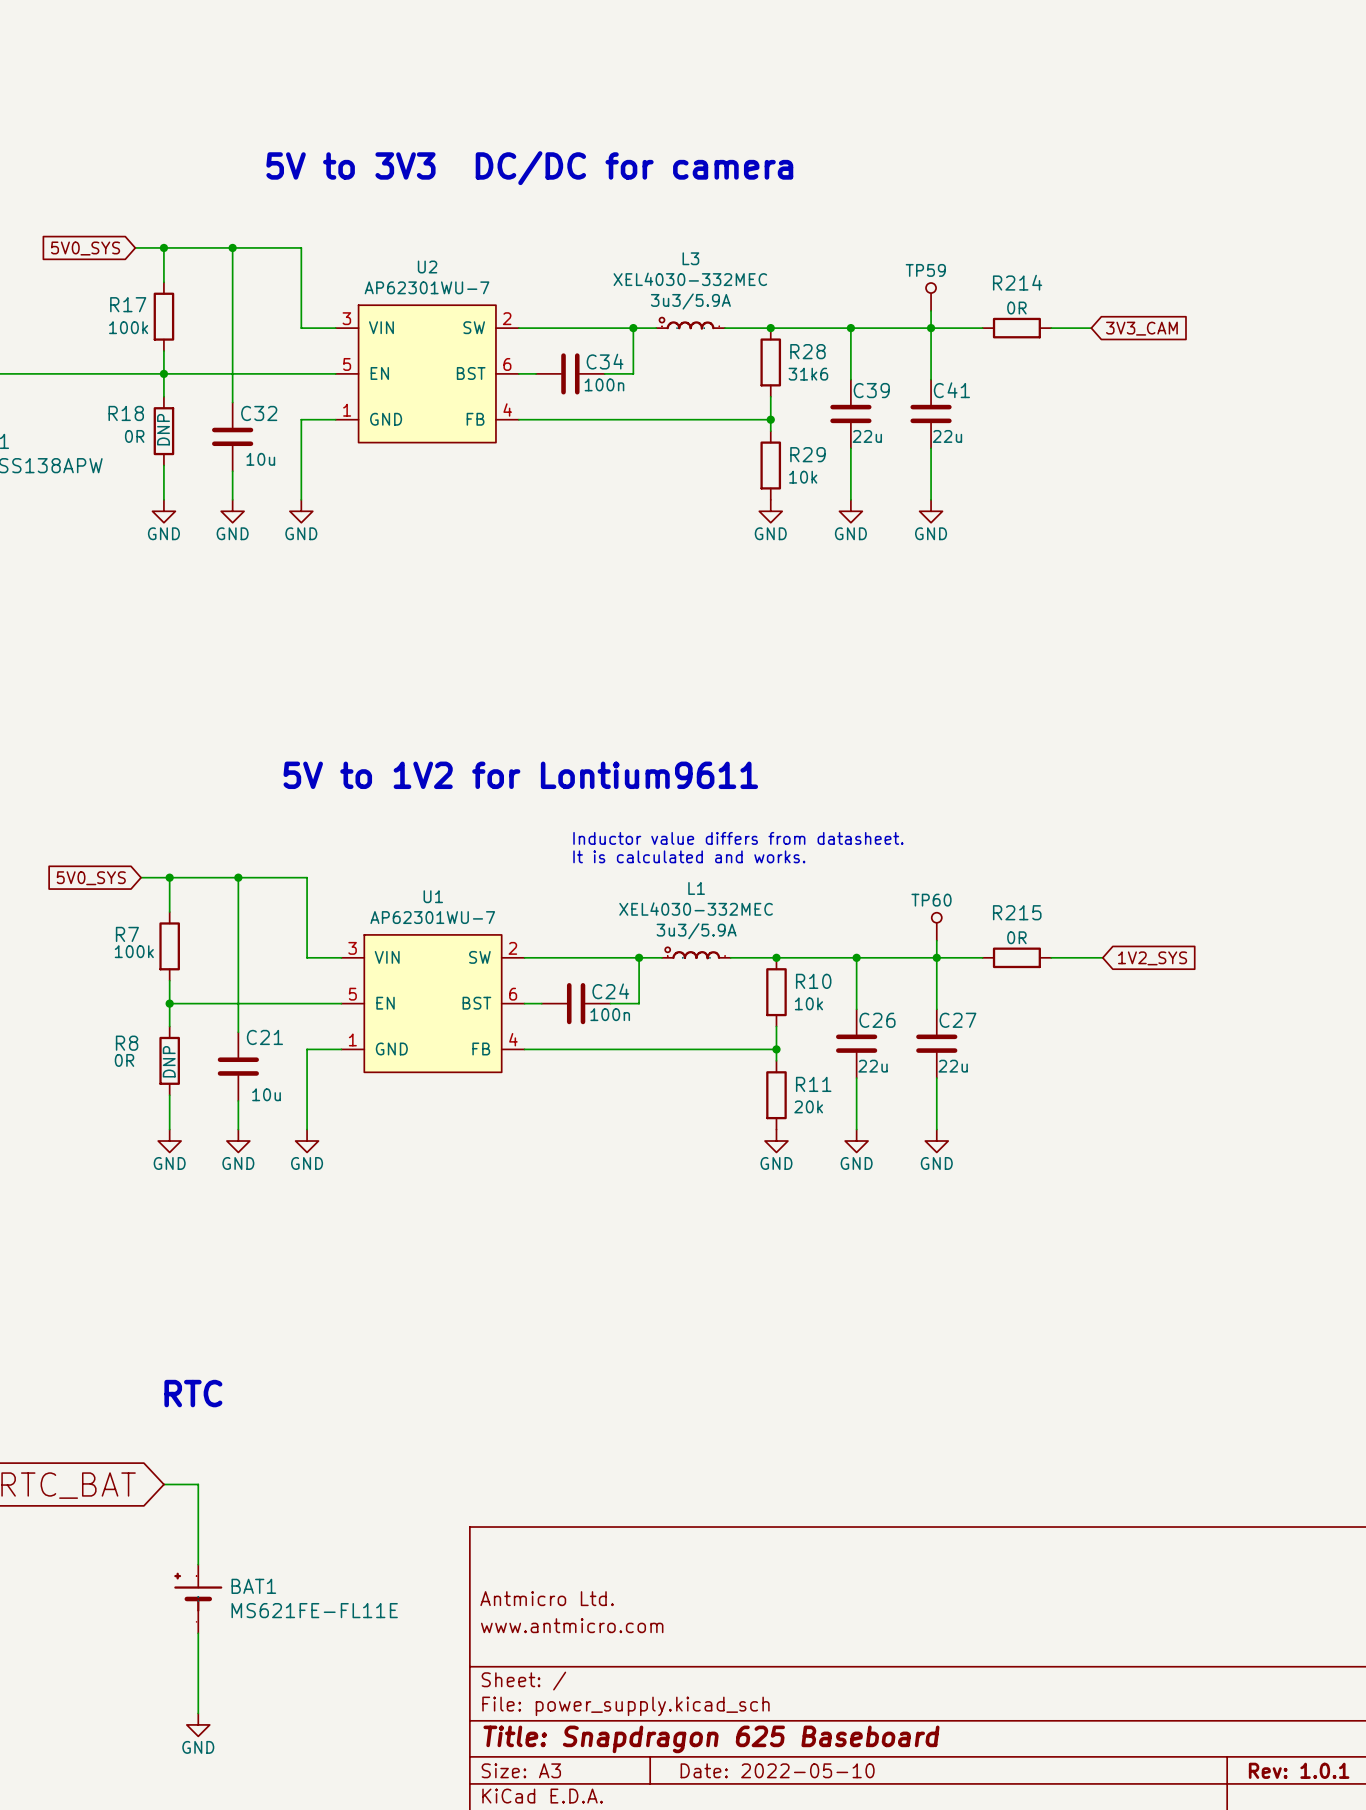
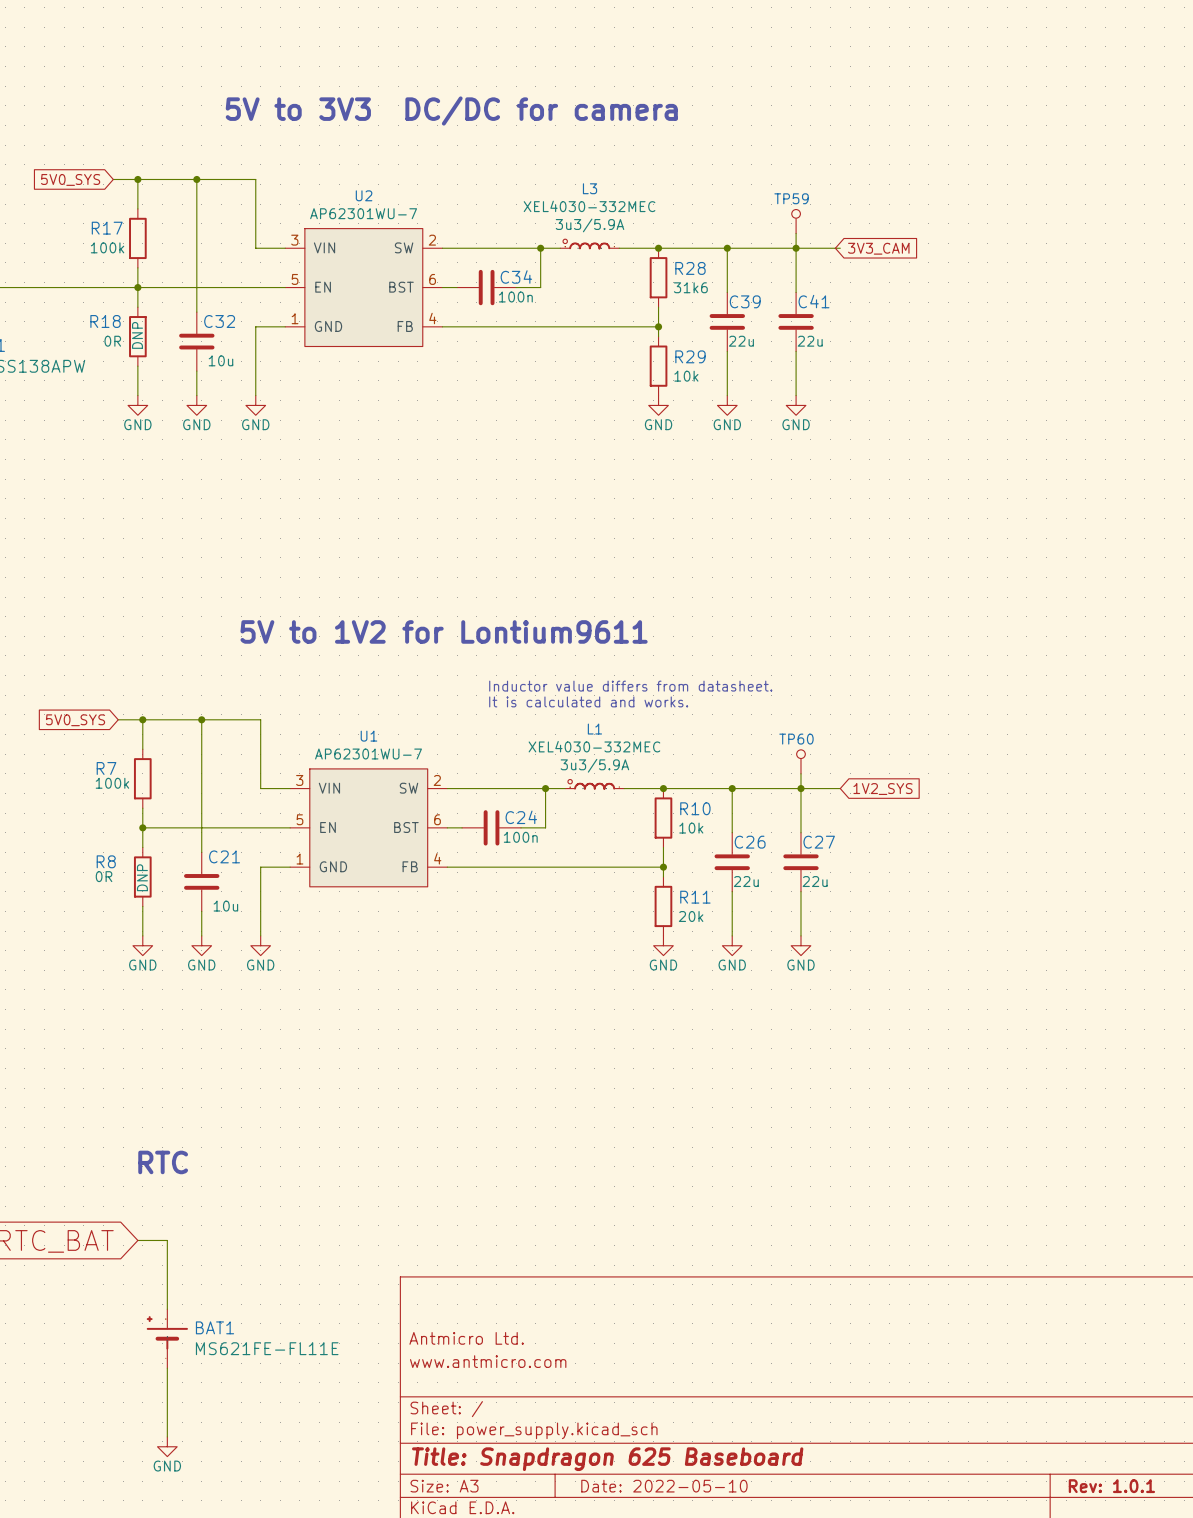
R214: (1016, 328) -> none
wire: (1051, 328) (1091, 328) -> none
global label position: 3V3_CAM (1141, 328) -> 3V3_CAM (878, 248)
R215: (1016, 957) -> none
wire: (1051, 957) (1102, 957) -> none
global label position: 1V2_SYS (1152, 958) -> 1V2_SYS (882, 789)

